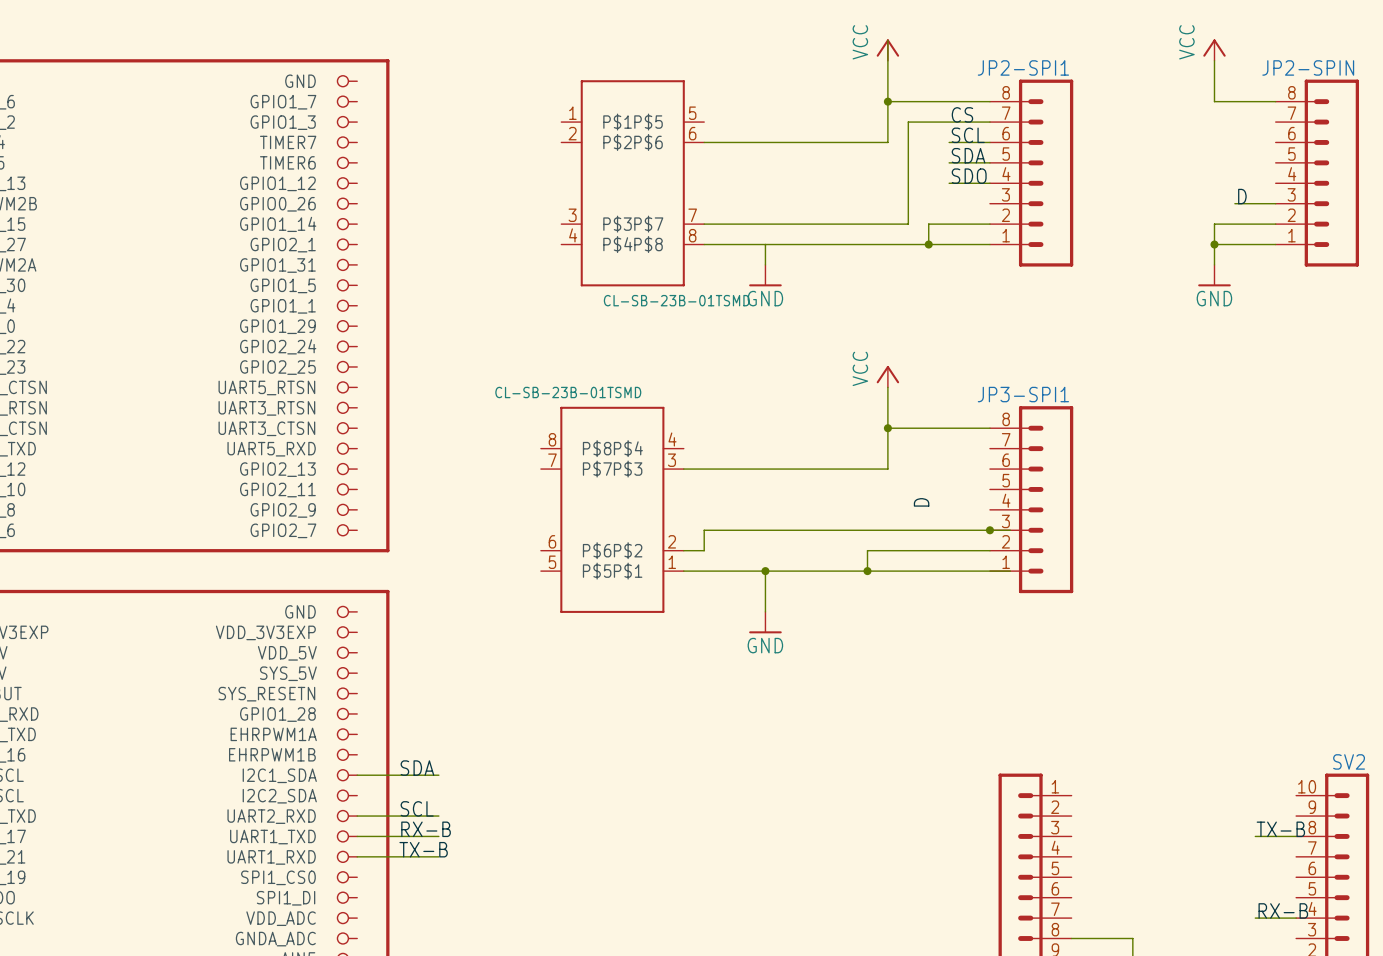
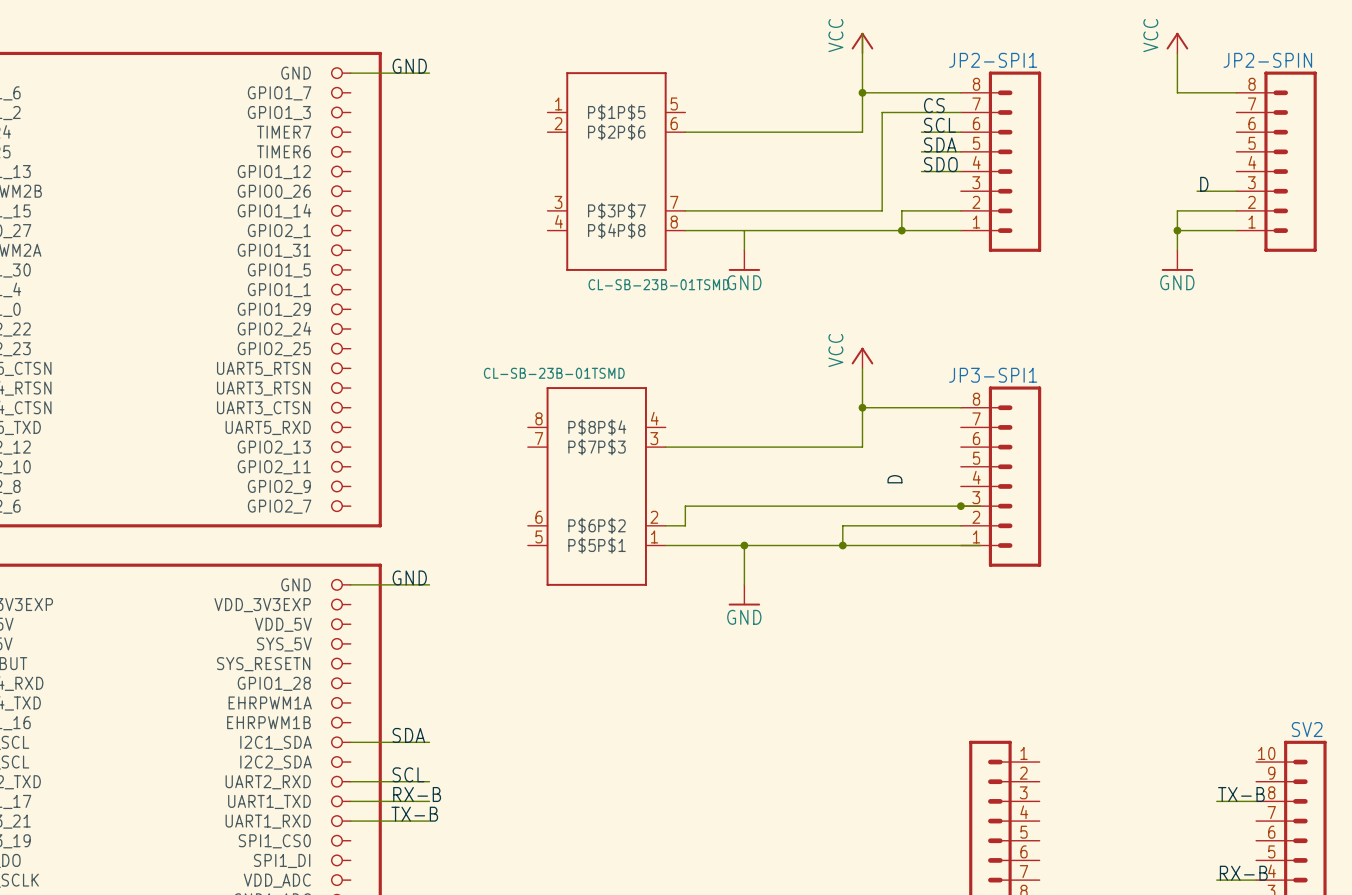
label: none -> GND (409, 66)
wire: none -> (350, 73) (429, 73)
label: none -> GND (409, 577)
wire: none -> (350, 584) (429, 584)

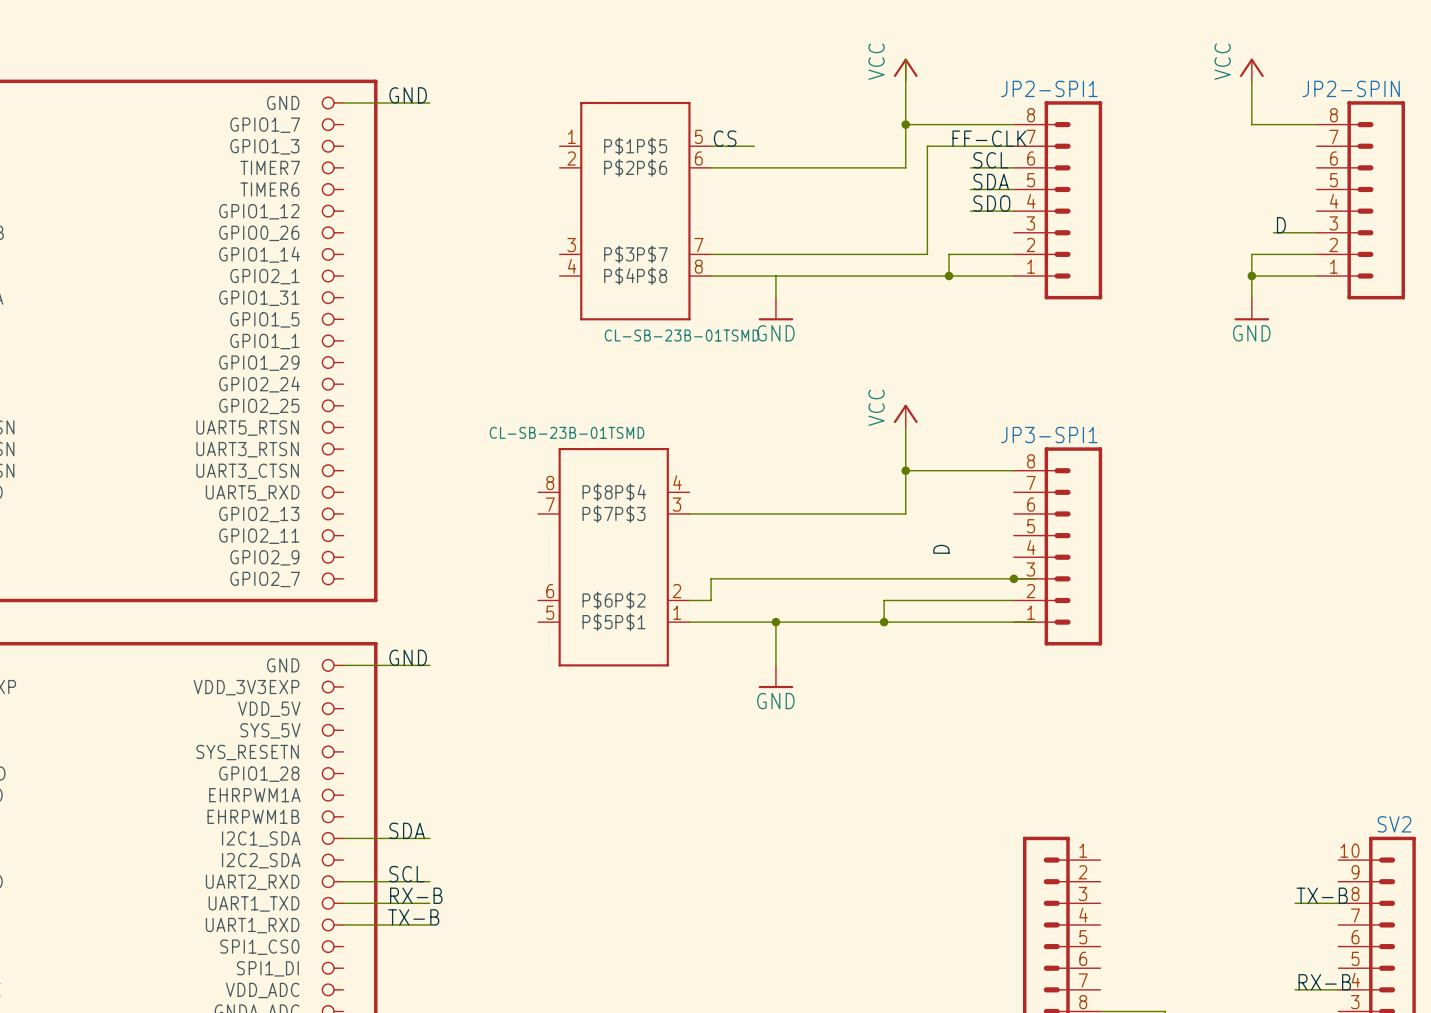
label: none -> CS (725, 138)
label: CS (934, 105) -> none
label: none -> FF-CLK (989, 138)
wire: none -> (711, 146) (754, 146)

